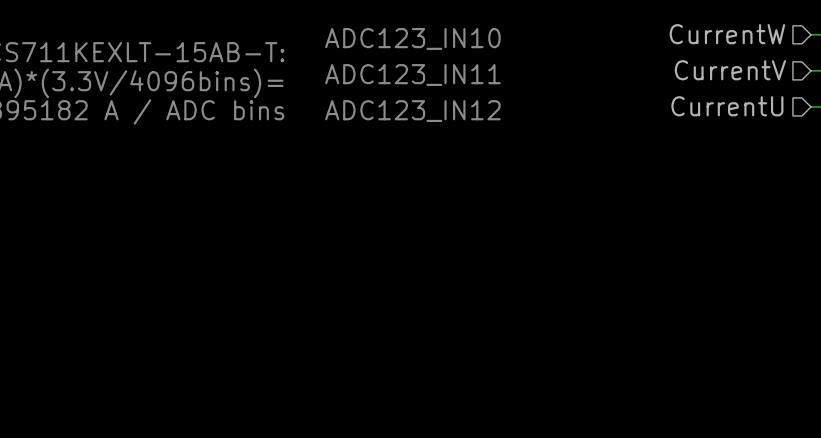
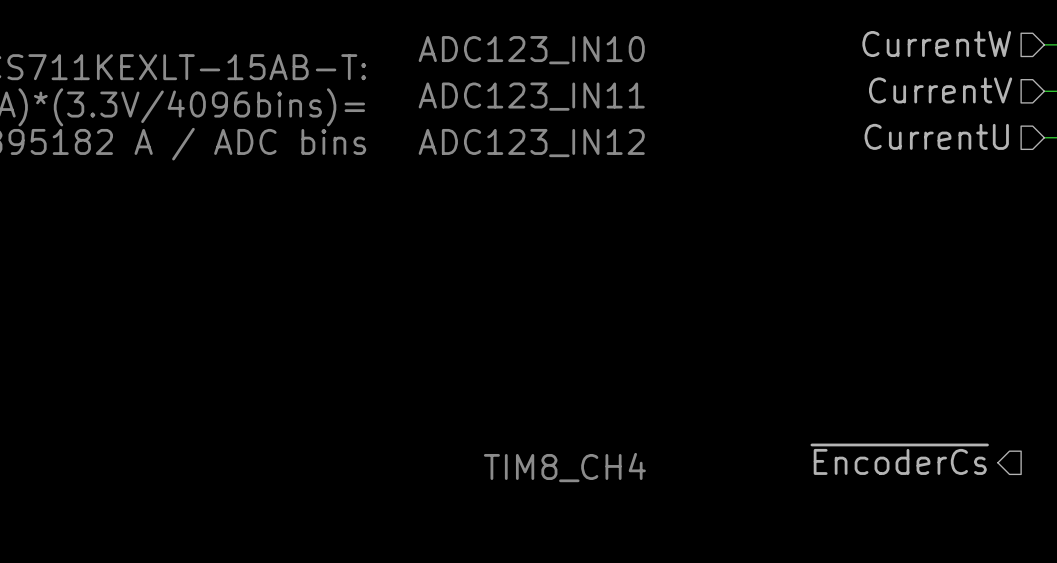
hierarchical label: none -> ~{EncoderCs} (899, 459)
text: none -> TIM8_CH4 (564, 467)

